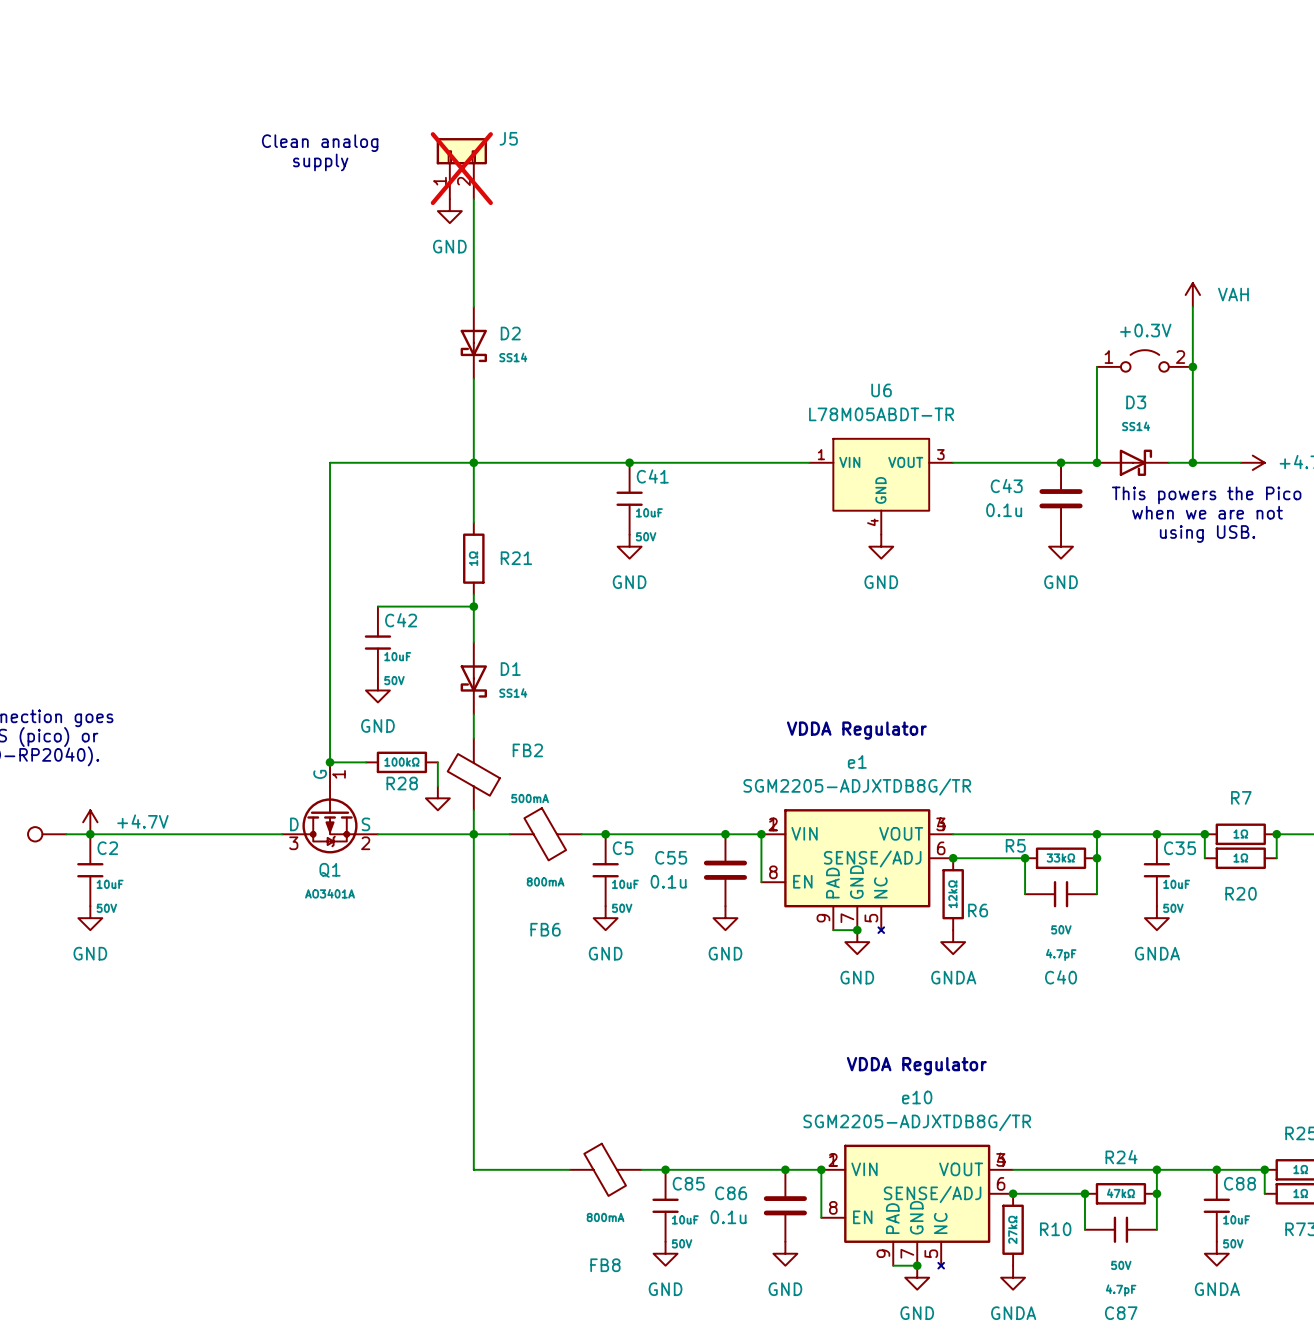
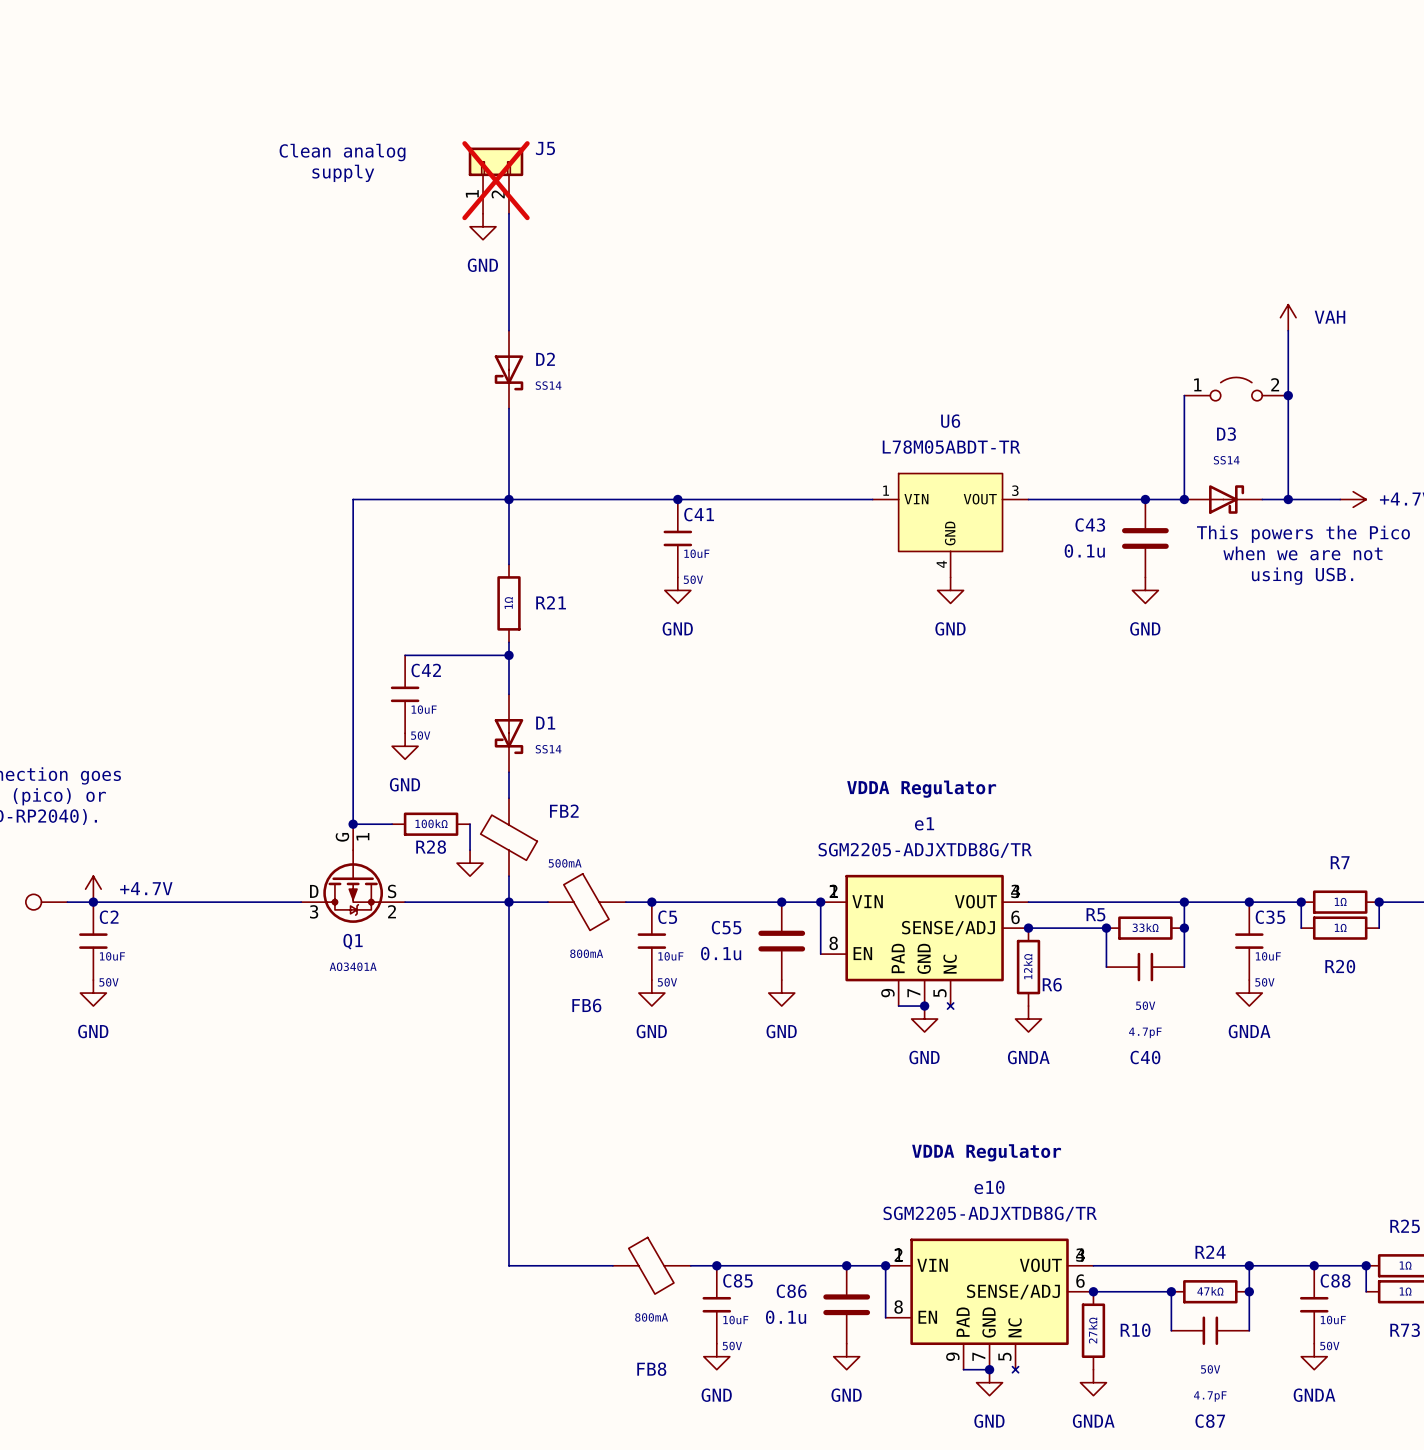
part value: +0.3V (1145, 330) -> none

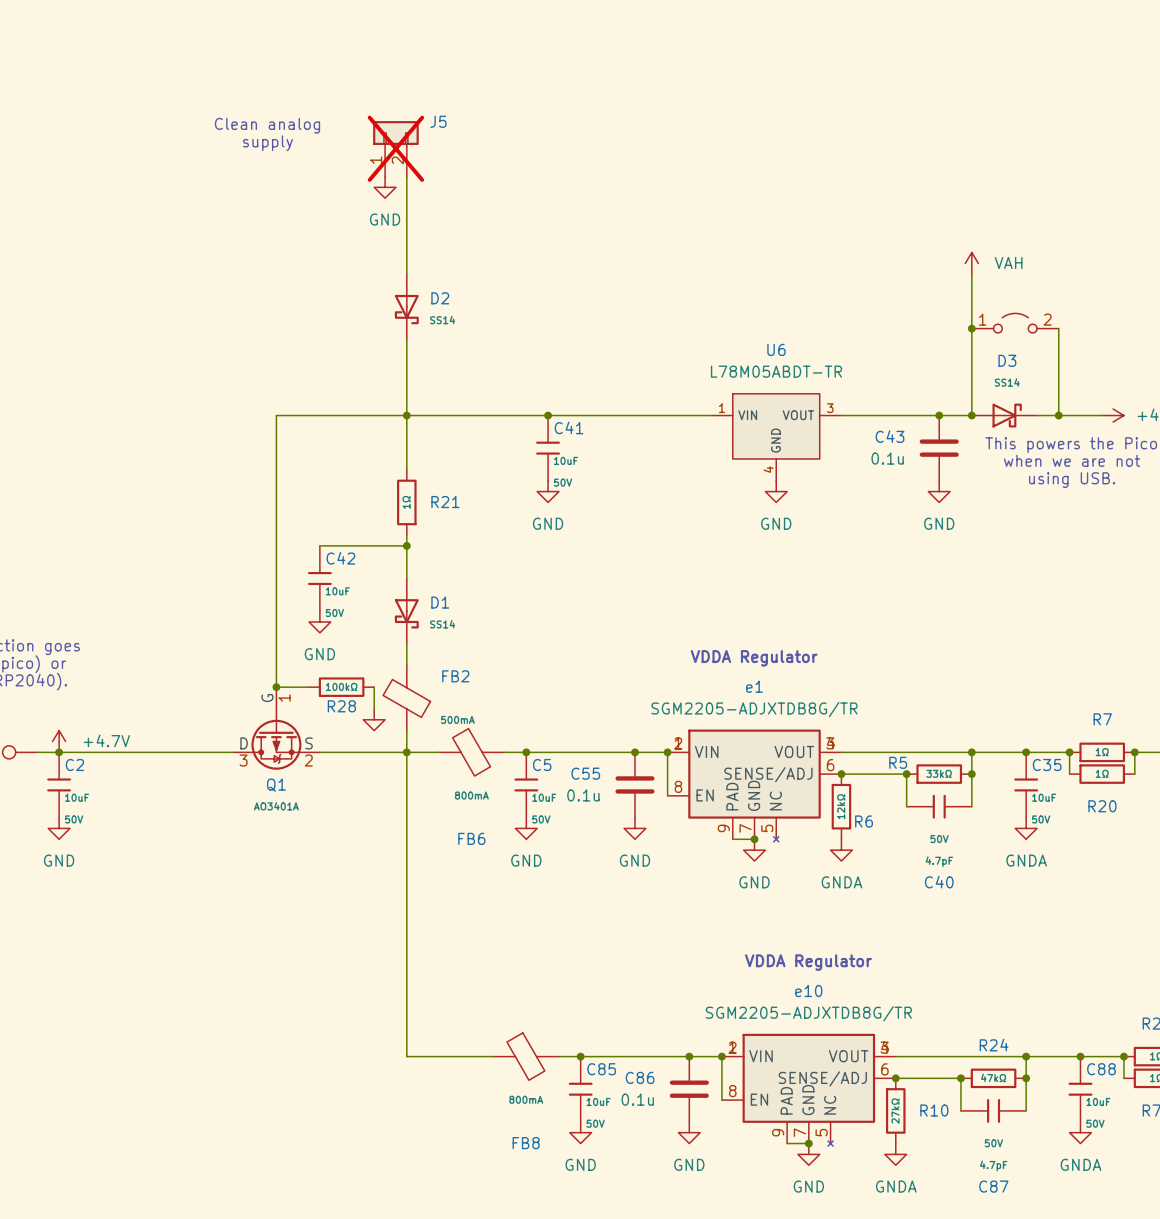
power symbol position: VAH (1288, 317) -> VAH (971, 263)
wire: (1288, 330) (1288, 395) -> (971, 274) (971, 328)
junction: none -> (971, 328)
junction: (1288, 395) -> none

